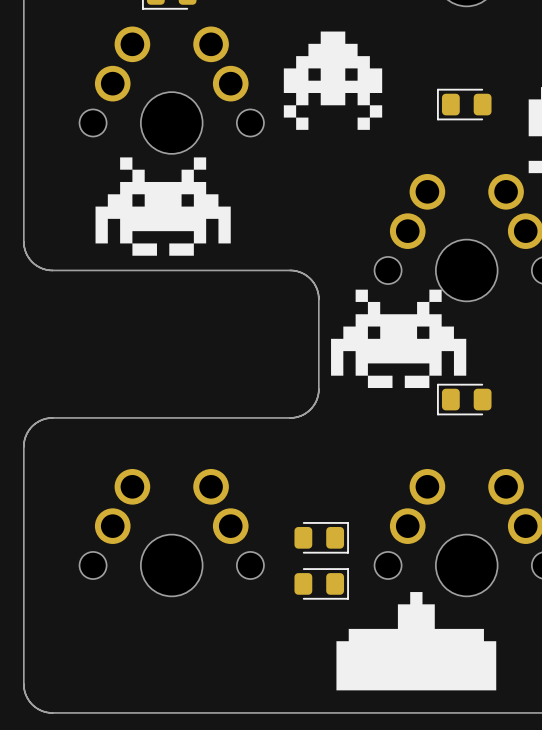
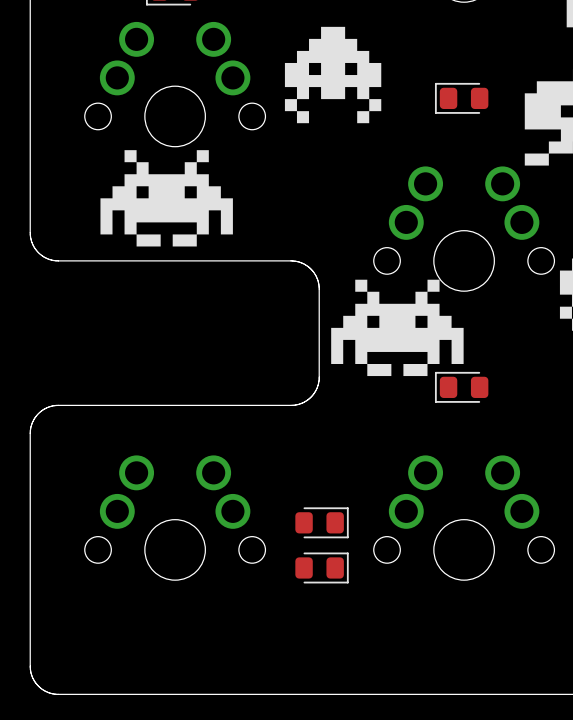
drawing: [336, 592, 497, 691] -> none

